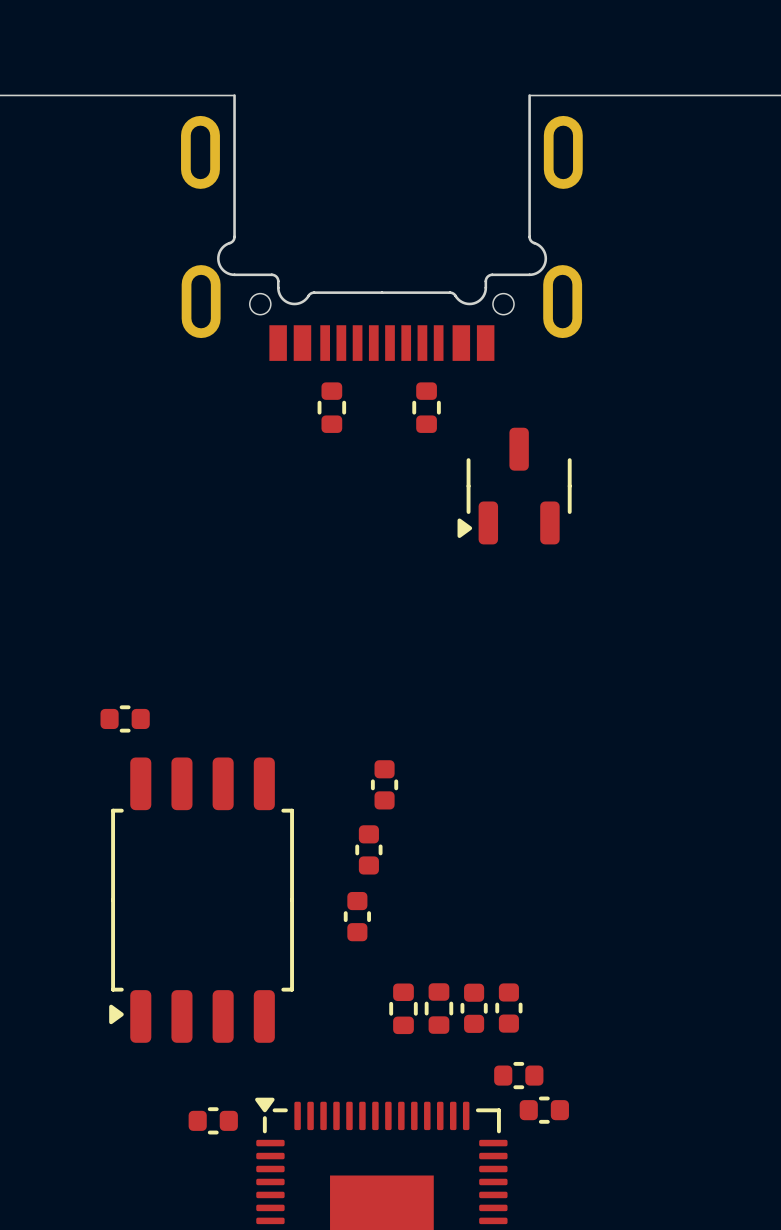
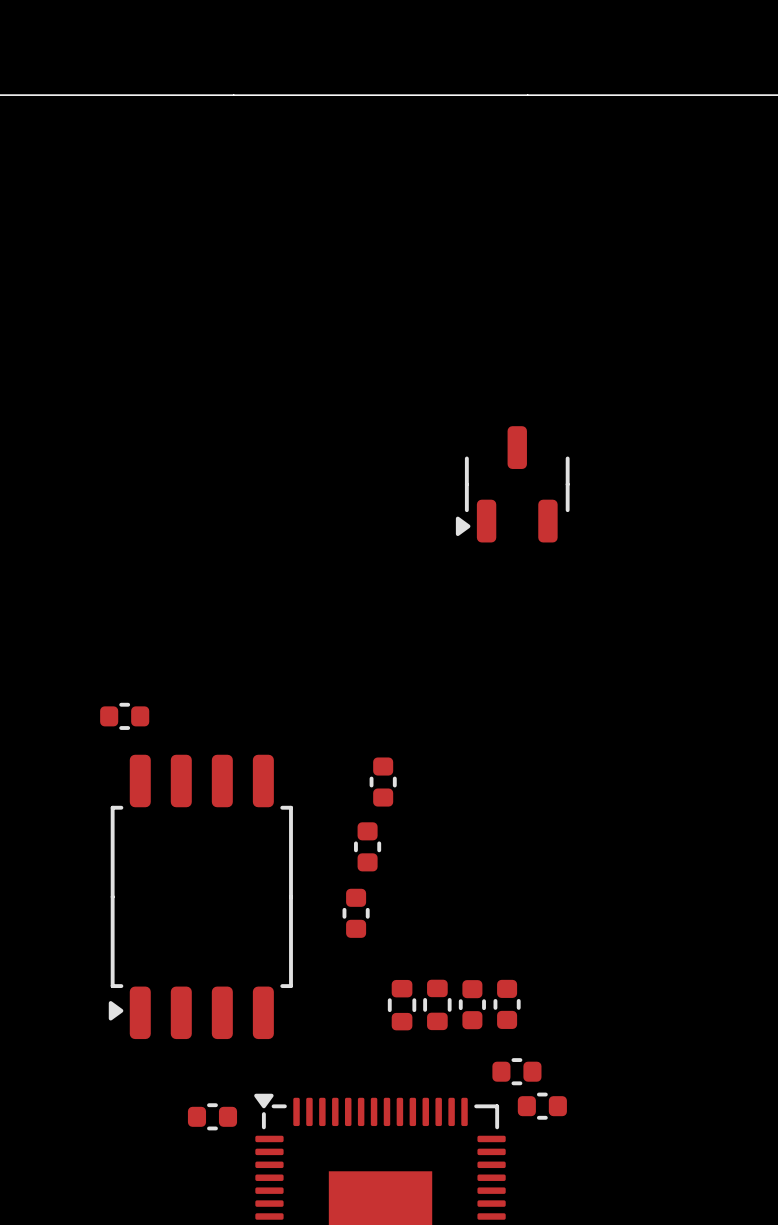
board edge: none -> (233, 95) (527, 95)
part: (381, 227) -> none
part: (331, 407) -> none
part: (426, 407) -> none

